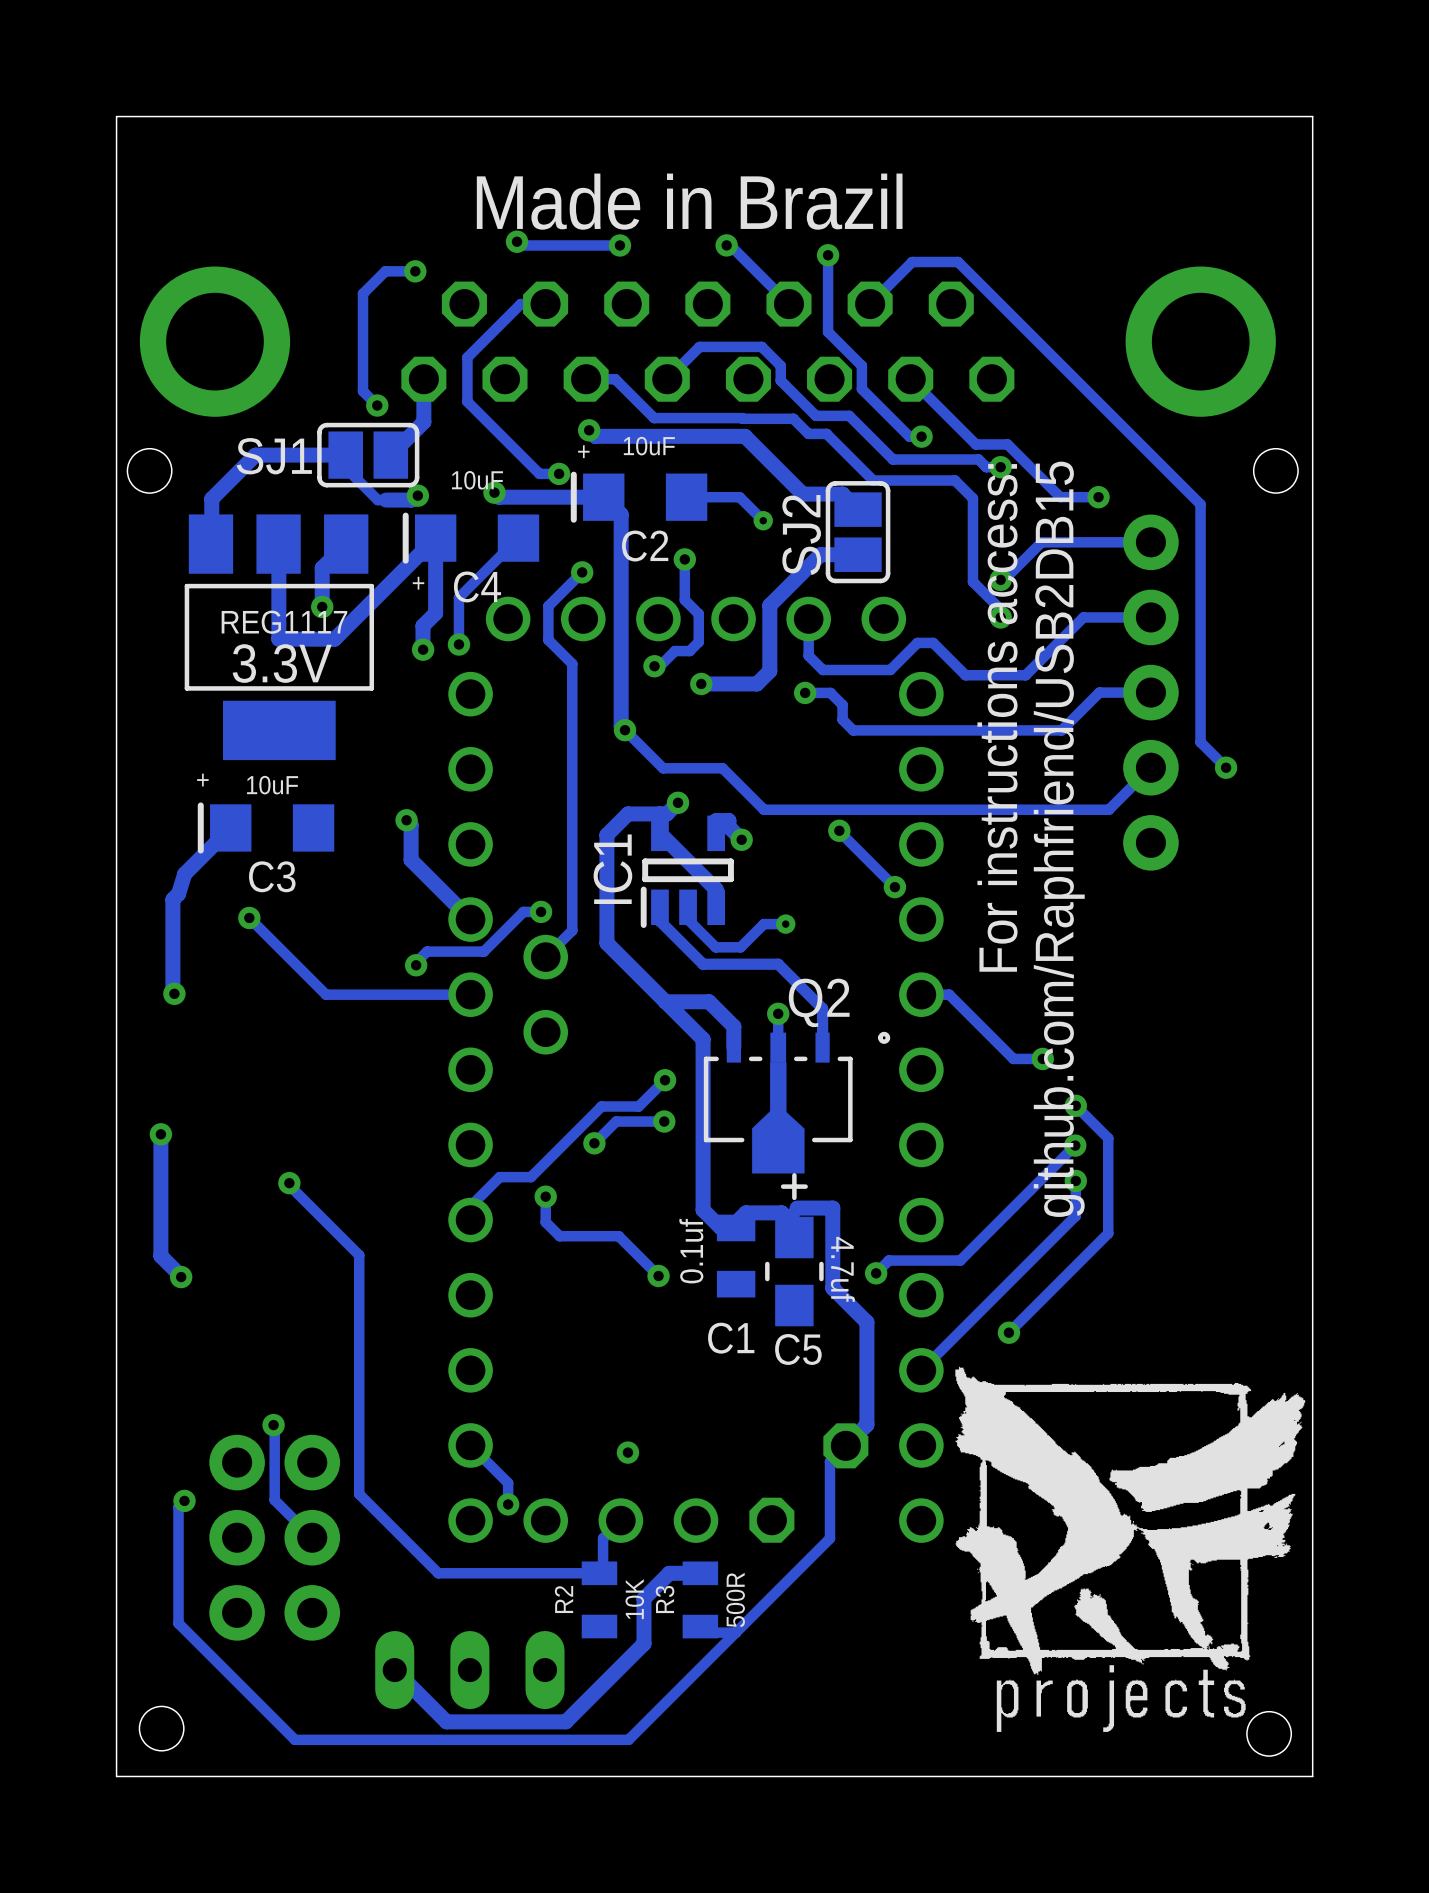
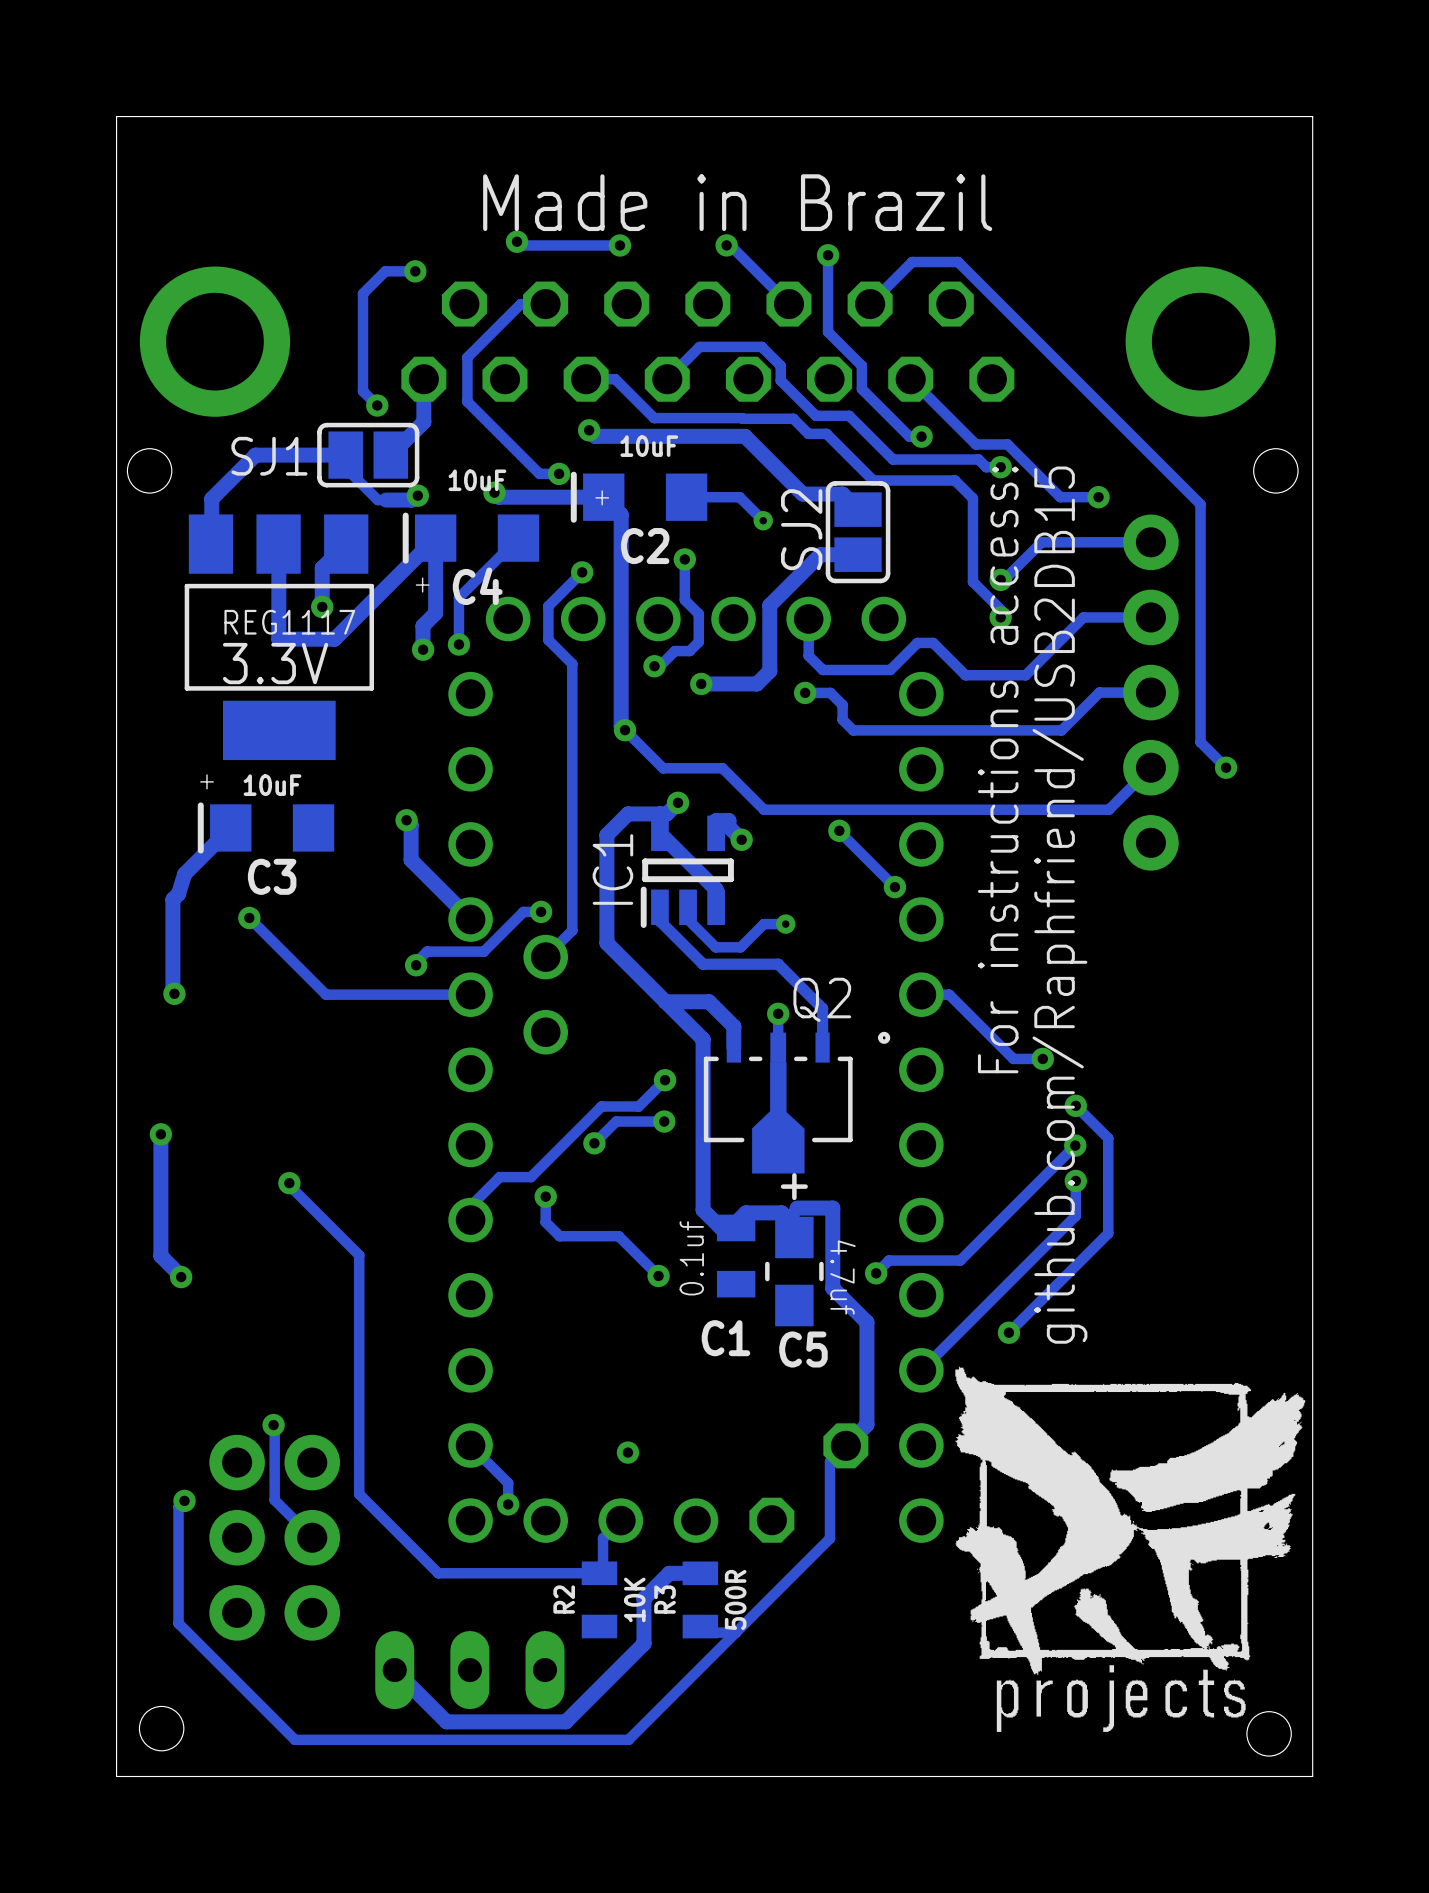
text position: + (583, 451) -> + (602, 497)

